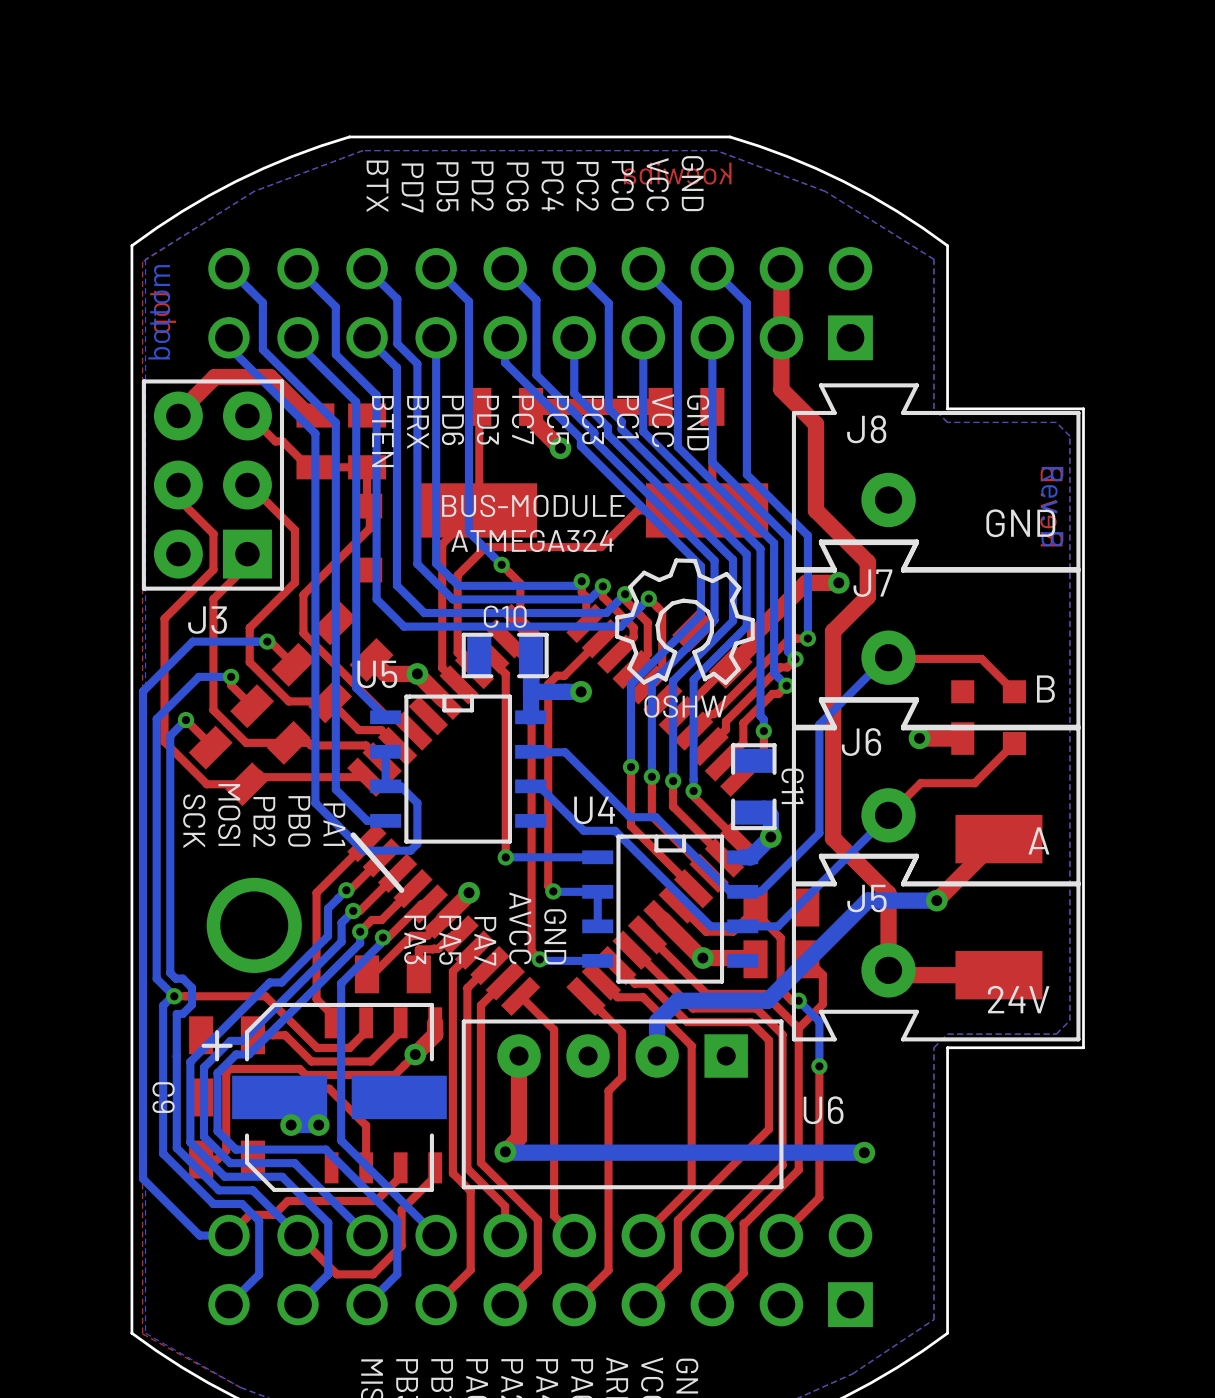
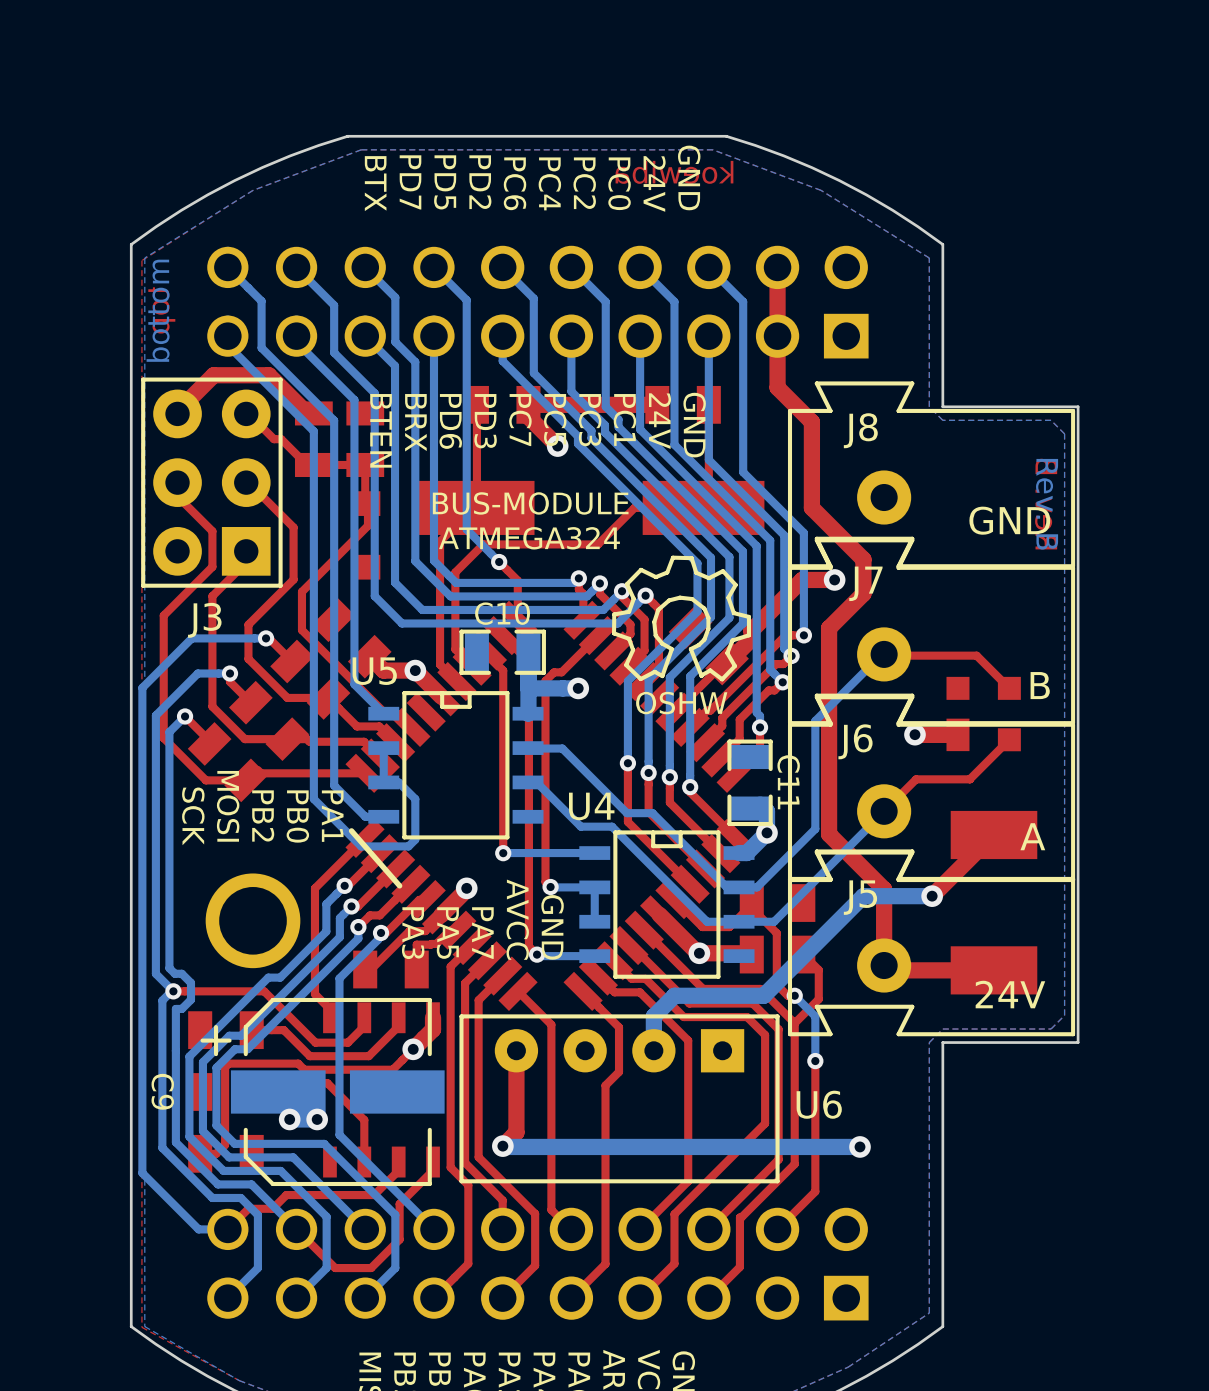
text: VCC (657, 184) -> 24V (654, 183)
text: VCC (663, 420) -> 24V (660, 421)

